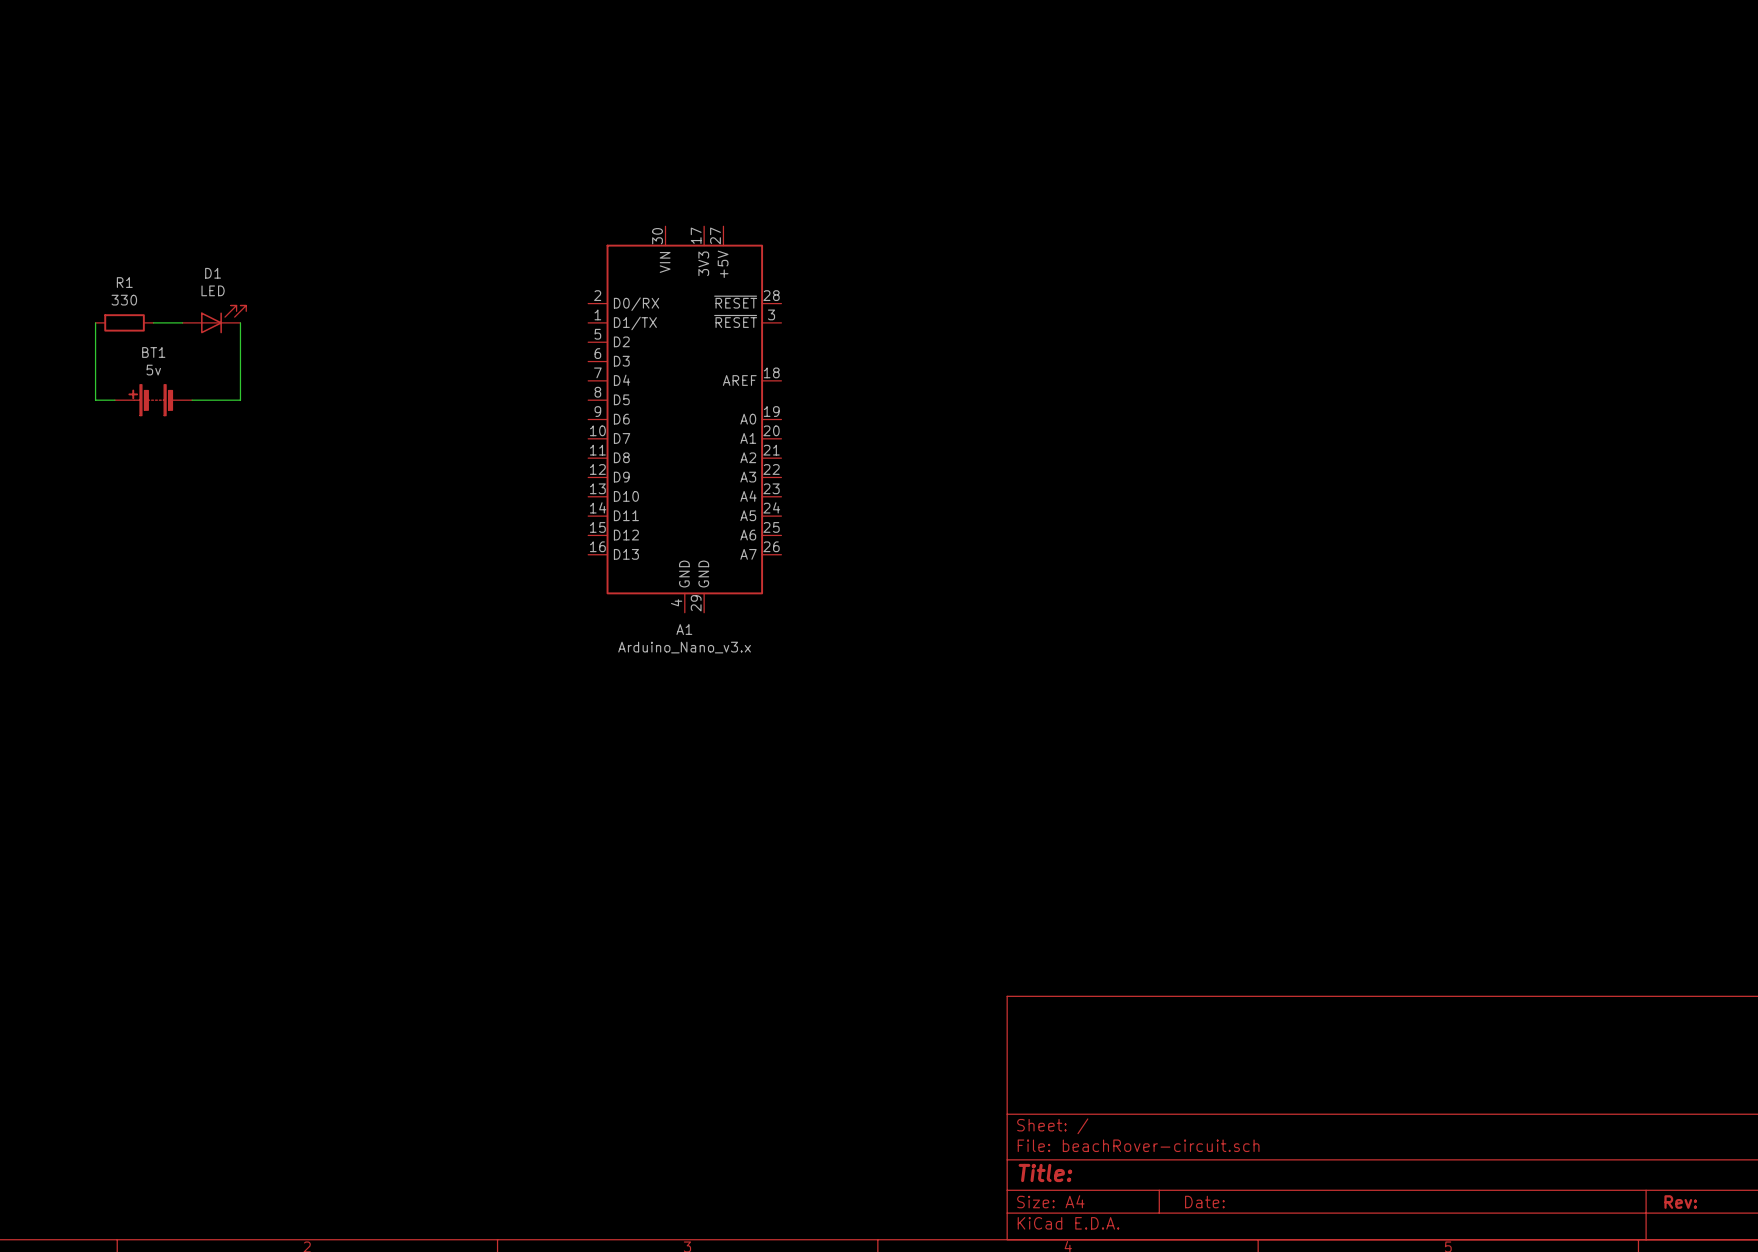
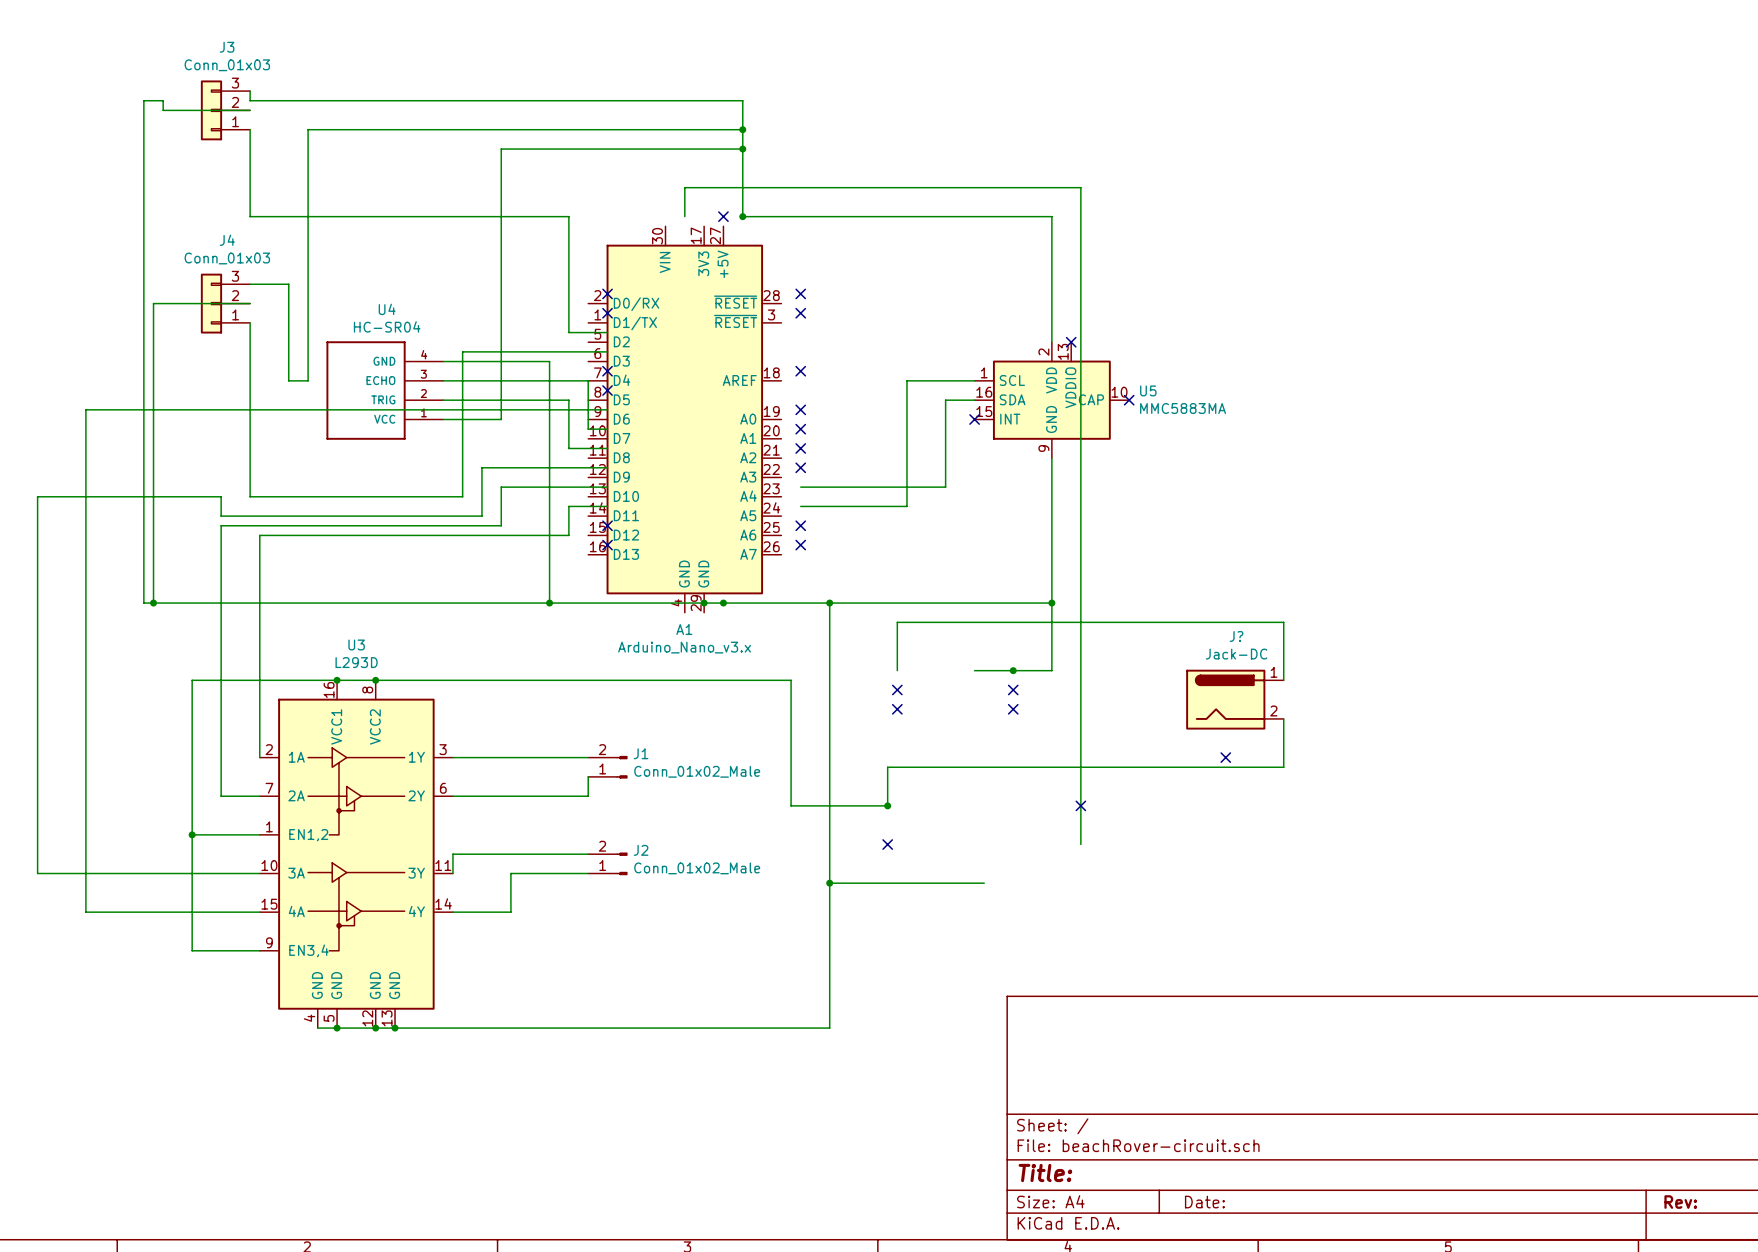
wire: none -> (250, 91) (250, 100) (742, 100) (742, 216) (1051, 216) (1051, 342)
J3: none -> Conn_01x03 (225, 110)
wire: none -> (250, 110) (163, 110) (163, 100) (143, 100) (143, 603) (1051, 603)
wire: none -> (250, 129) (250, 216) (568, 216) (568, 332) (607, 332)
wire: none -> (742, 129) (308, 129) (308, 380) (288, 380) (288, 284) (250, 284)
junction: none -> (742, 129)
wire: none -> (742, 149) (501, 149) (501, 419) (443, 419)
junction: none -> (742, 149)
wire: none -> (684, 216) (684, 187) (1080, 187) (1080, 844)
no-connect mark: none -> (723, 216)
junction: none -> (742, 216)
no-connect mark: none -> (607, 293)
no-connect mark: none -> (800, 293)
J4: none -> Conn_01x03 (225, 303)
wire: none -> (250, 303) (153, 303) (153, 603)
no-connect mark: none -> (607, 313)
no-connect mark: none -> (800, 313)
D1: LED (214, 319) -> none
wire: (95, 322) (95, 400) (114, 400) -> none
R1: 330 (124, 322) -> none
wire: (153, 322) (182, 322) -> none
wire: (240, 322) (240, 400) (192, 400) -> none
wire: none -> (250, 322) (250, 496) (462, 496) (462, 351) (607, 351)
no-connect mark: none -> (1071, 342)
wire: none -> (443, 361) (549, 361) (549, 603)
no-connect mark: none -> (607, 371)
no-connect mark: none -> (800, 371)
wire: none -> (443, 380) (588, 380) (588, 429) (607, 429)
wire: none -> (974, 380) (906, 380) (906, 506) (800, 506)
U4: none -> HC-SR04 (384, 390)
no-connect mark: none -> (607, 390)
BT1: 5v (153, 400) -> none
wire: none -> (443, 400) (568, 400) (568, 448) (607, 448)
wire: none -> (974, 400) (945, 400) (945, 487) (800, 487)
U5: none -> MMC5883MA (1051, 400)
no-connect mark: none -> (1129, 400)
wire: none -> (607, 409) (85, 409) (85, 912) (259, 912)
no-connect mark: none -> (800, 409)
no-connect mark: none -> (974, 419)
no-connect mark: none -> (800, 429)
no-connect mark: none -> (800, 448)
wire: none -> (1051, 458) (1051, 670) (974, 670)
wire: none -> (607, 467) (481, 467) (481, 516) (221, 516) (221, 496) (37, 496) (37, 873) (259, 873)
no-connect mark: none -> (800, 467)
wire: none -> (607, 487) (501, 487) (501, 525) (221, 525) (221, 796) (259, 796)
wire: none -> (607, 506) (568, 506) (568, 535) (259, 535) (259, 757)
no-connect mark: none -> (607, 525)
no-connect mark: none -> (800, 525)
no-connect mark: none -> (607, 545)
no-connect mark: none -> (800, 545)
junction: none -> (153, 603)
junction: none -> (549, 603)
junction: none -> (704, 603)
junction: none -> (723, 603)
wire: none -> (829, 603) (829, 1028) (317, 1028)
junction: none -> (829, 603)
junction: none -> (1051, 603)
wire: none -> (897, 670) (897, 622) (1283, 622) (1283, 680)
junction: none -> (1013, 670)
junction: none -> (337, 680)
junction: none -> (375, 680)
no-connect mark: none -> (897, 689)
no-connect mark: none -> (1013, 689)
J?: none -> Jack-DC (1234, 699)
no-connect mark: none -> (897, 709)
no-connect mark: none -> (1013, 709)
wire: none -> (1283, 718) (1283, 767) (887, 767) (887, 805) (791, 805) (791, 680) (192, 680) (192, 950) (259, 950)
wire: none -> (452, 757) (588, 757)
no-connect mark: none -> (1225, 757)
J1: none -> Conn_01x02_Male (607, 767)
wire: none -> (588, 776) (588, 796) (452, 796)
junction: none -> (887, 805)
no-connect mark: none -> (1080, 805)
wire: none -> (192, 834) (259, 834)
junction: none -> (192, 834)
no-connect mark: none -> (887, 844)
U3: none -> L293D (356, 854)
wire: none -> (588, 854) (452, 854) (452, 873)
J2: none -> Conn_01x02_Male (607, 863)
wire: none -> (588, 873) (510, 873) (510, 912) (452, 912)
wire: none -> (829, 883) (984, 883)
junction: none -> (829, 883)
junction: none -> (337, 1028)
junction: none -> (375, 1028)
junction: none -> (395, 1028)

